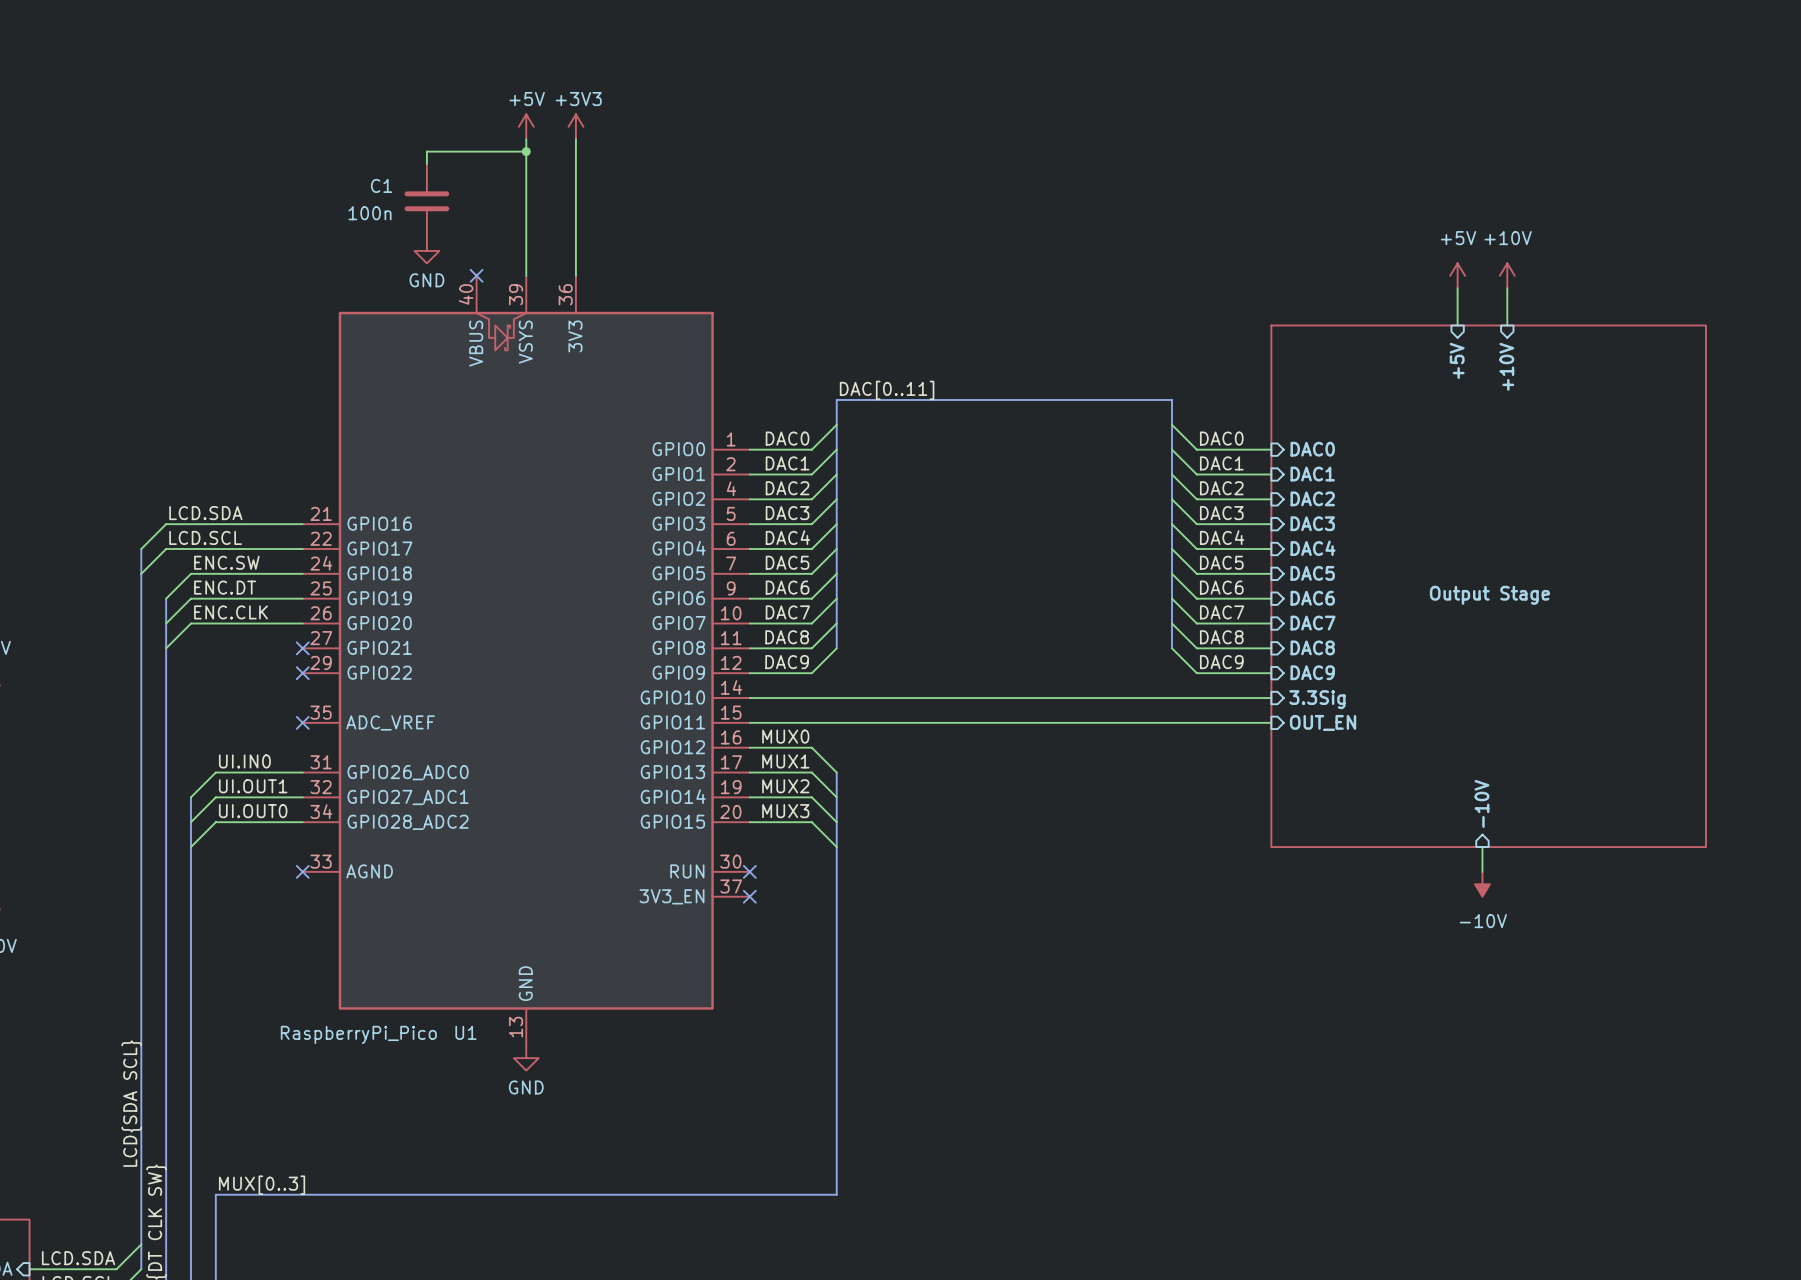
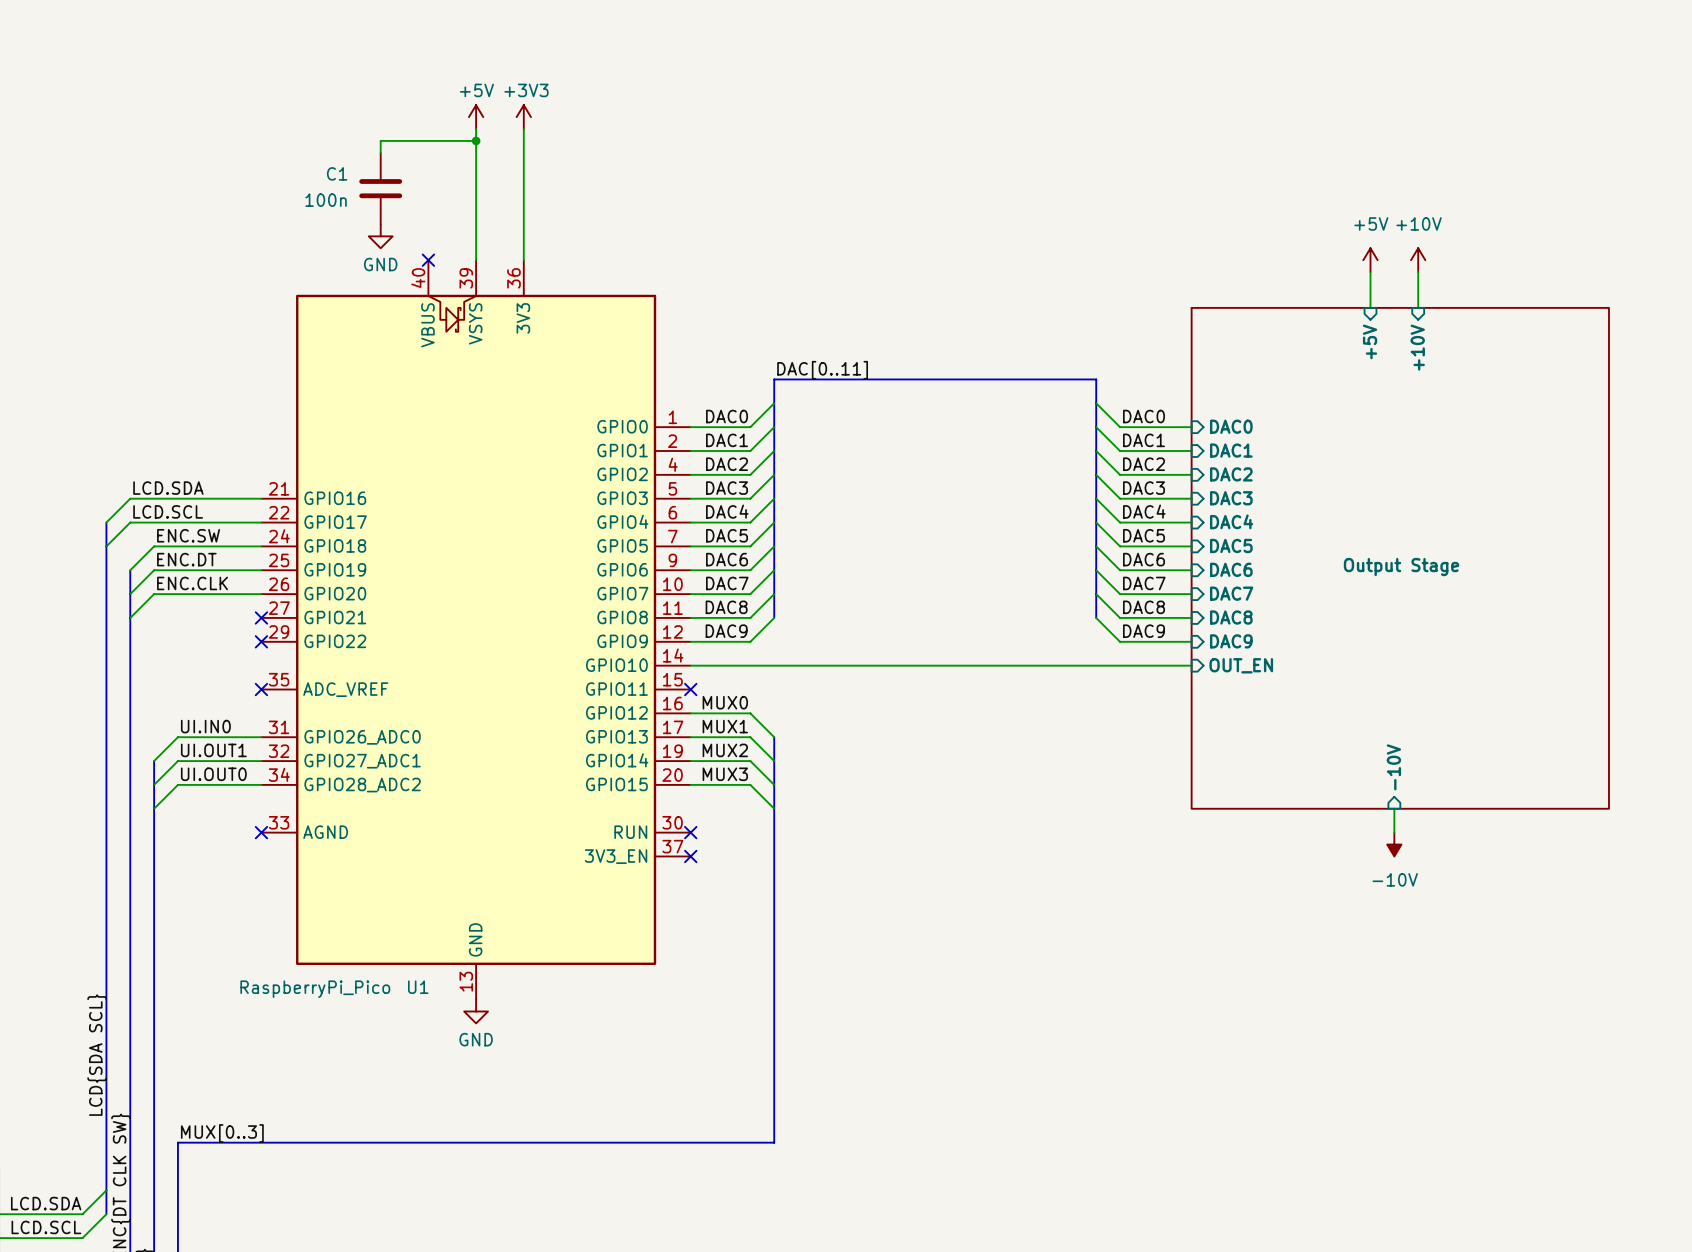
sheet pin: 3.3Sig (1317, 699) -> OUT_EN (1241, 665)
wire: (749, 722) (1271, 722) -> none
no-connect mark: none -> (690, 689)
sheet pin: OUT_EN (1323, 722) -> none

